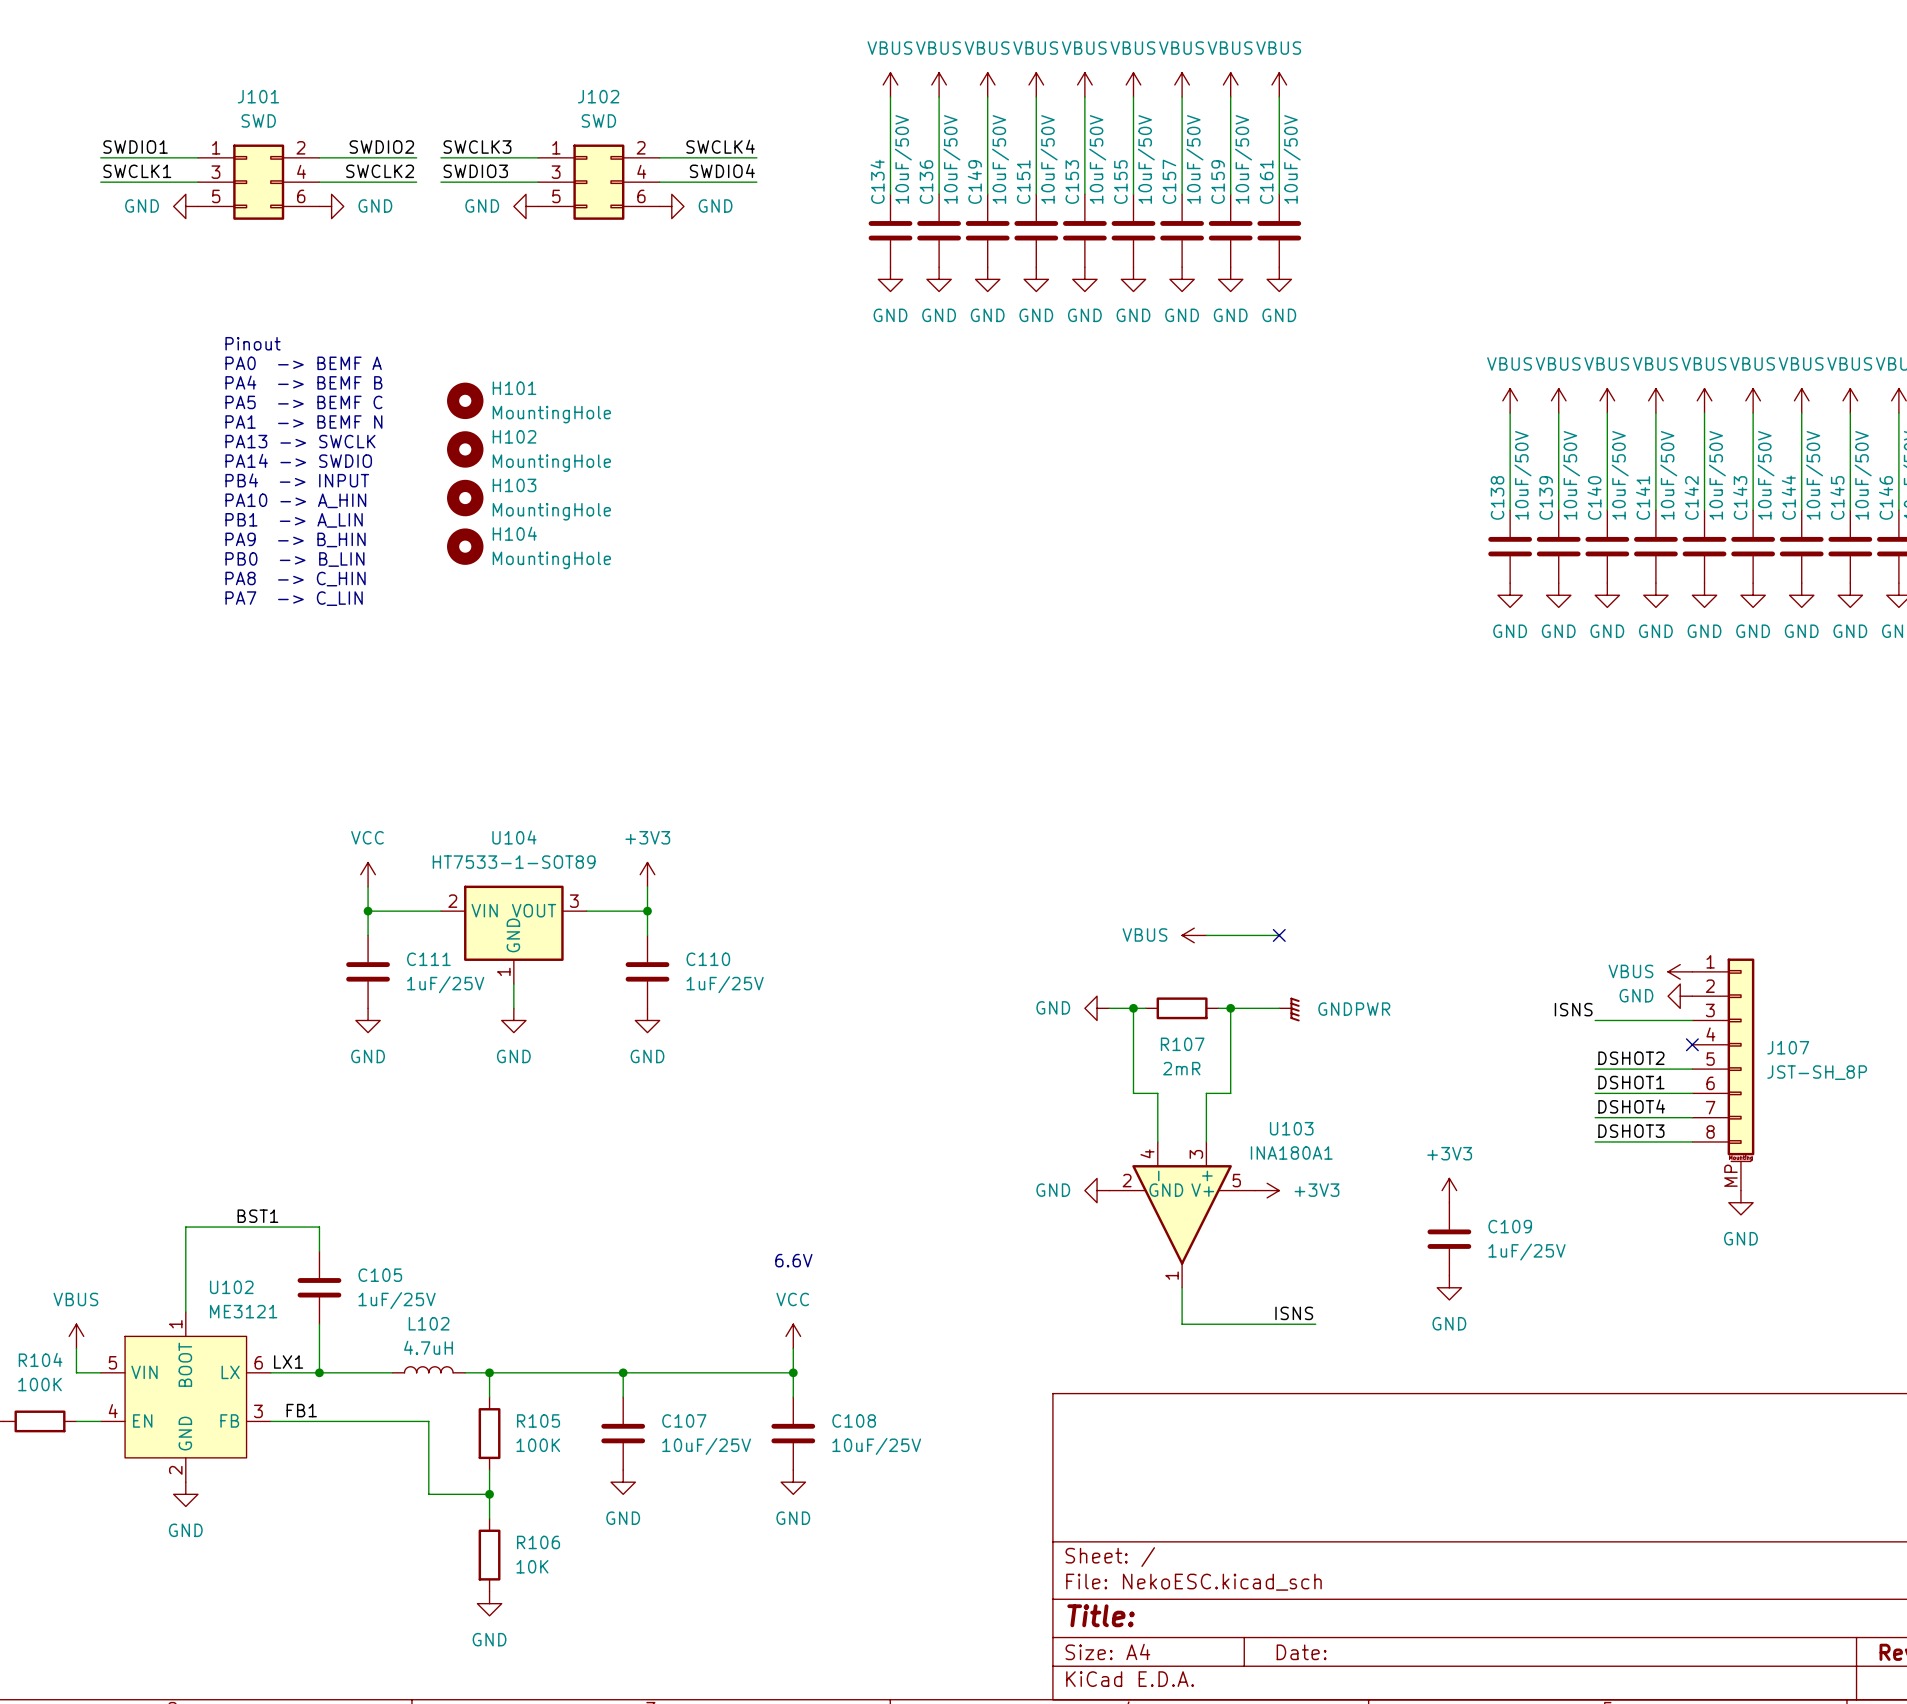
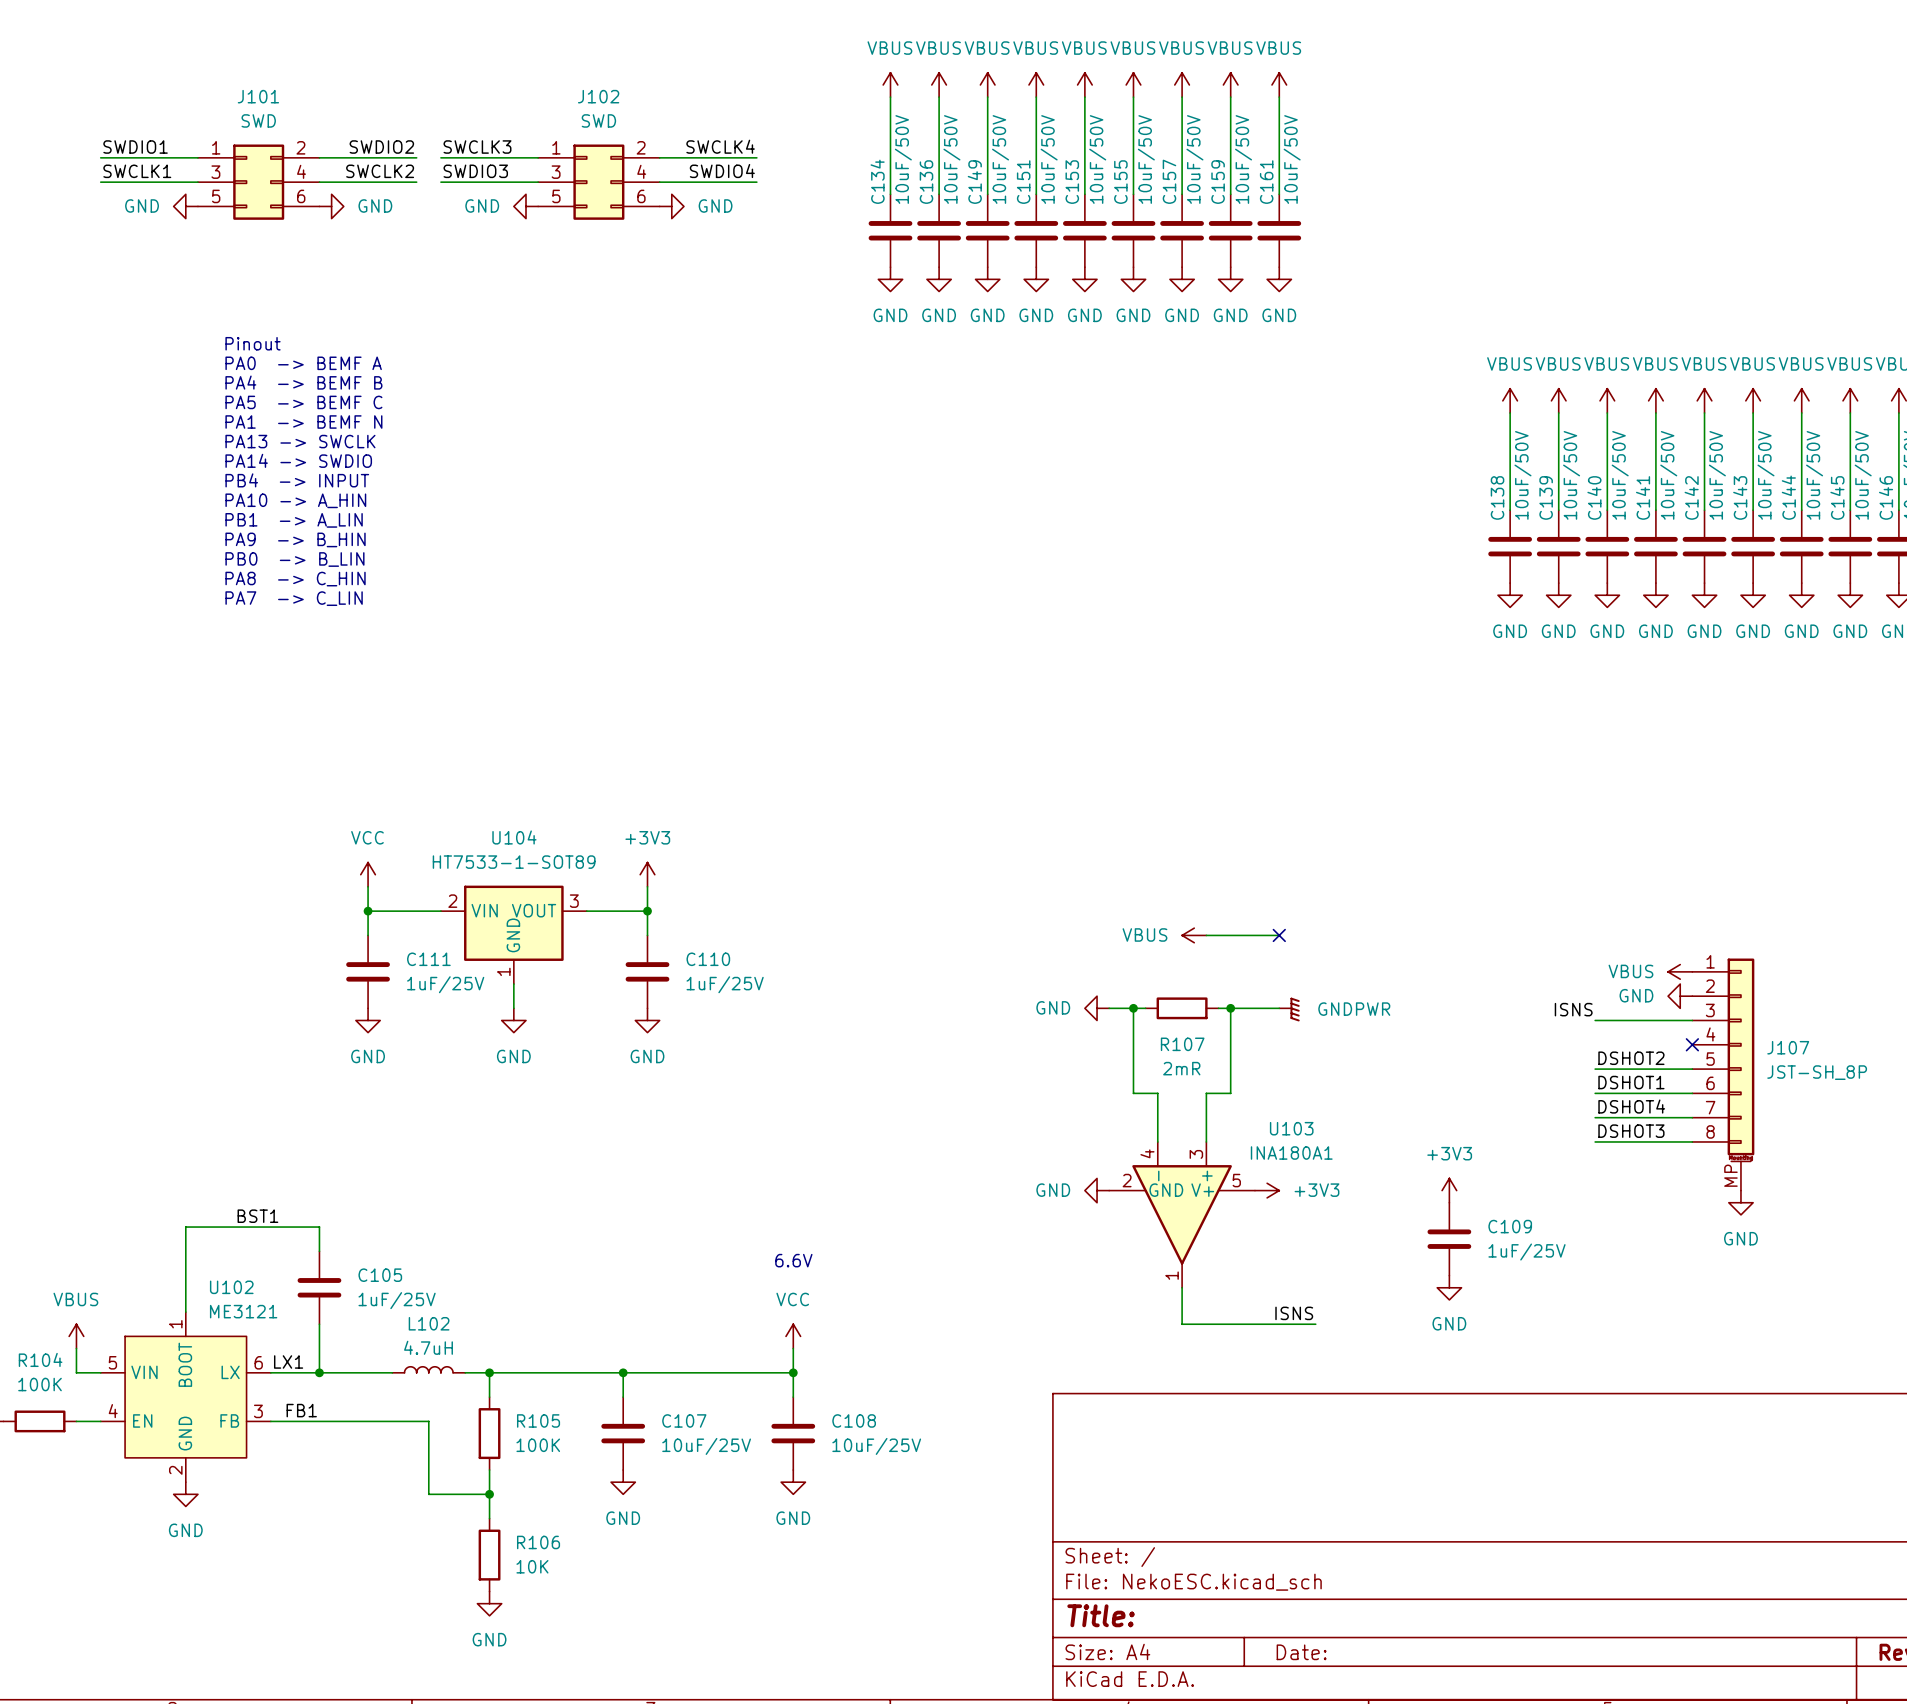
H101: MountingHole (465, 400) -> none
H102: MountingHole (465, 449) -> none
H103: MountingHole (465, 498) -> none
H104: MountingHole (465, 546) -> none

